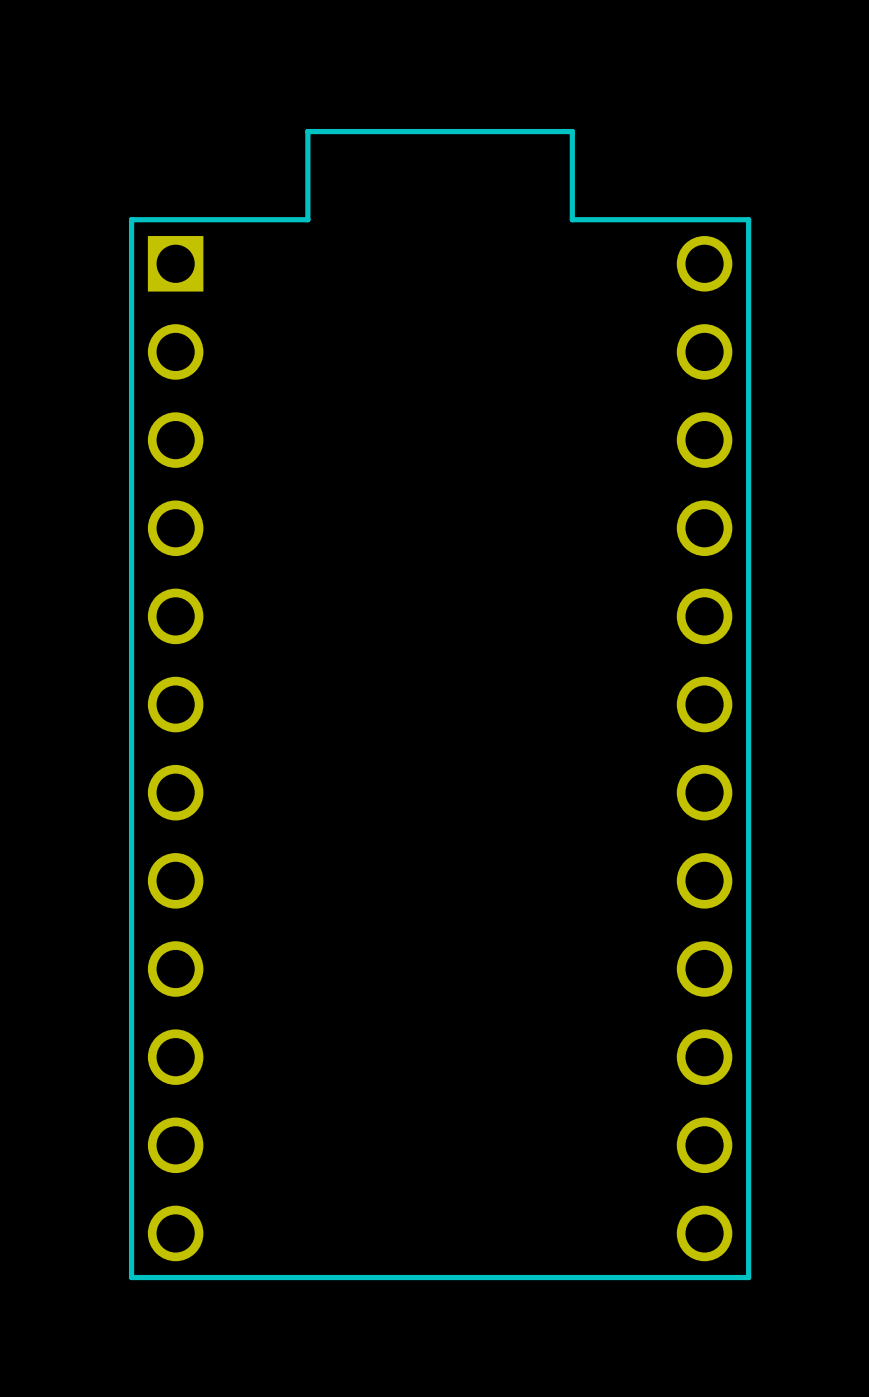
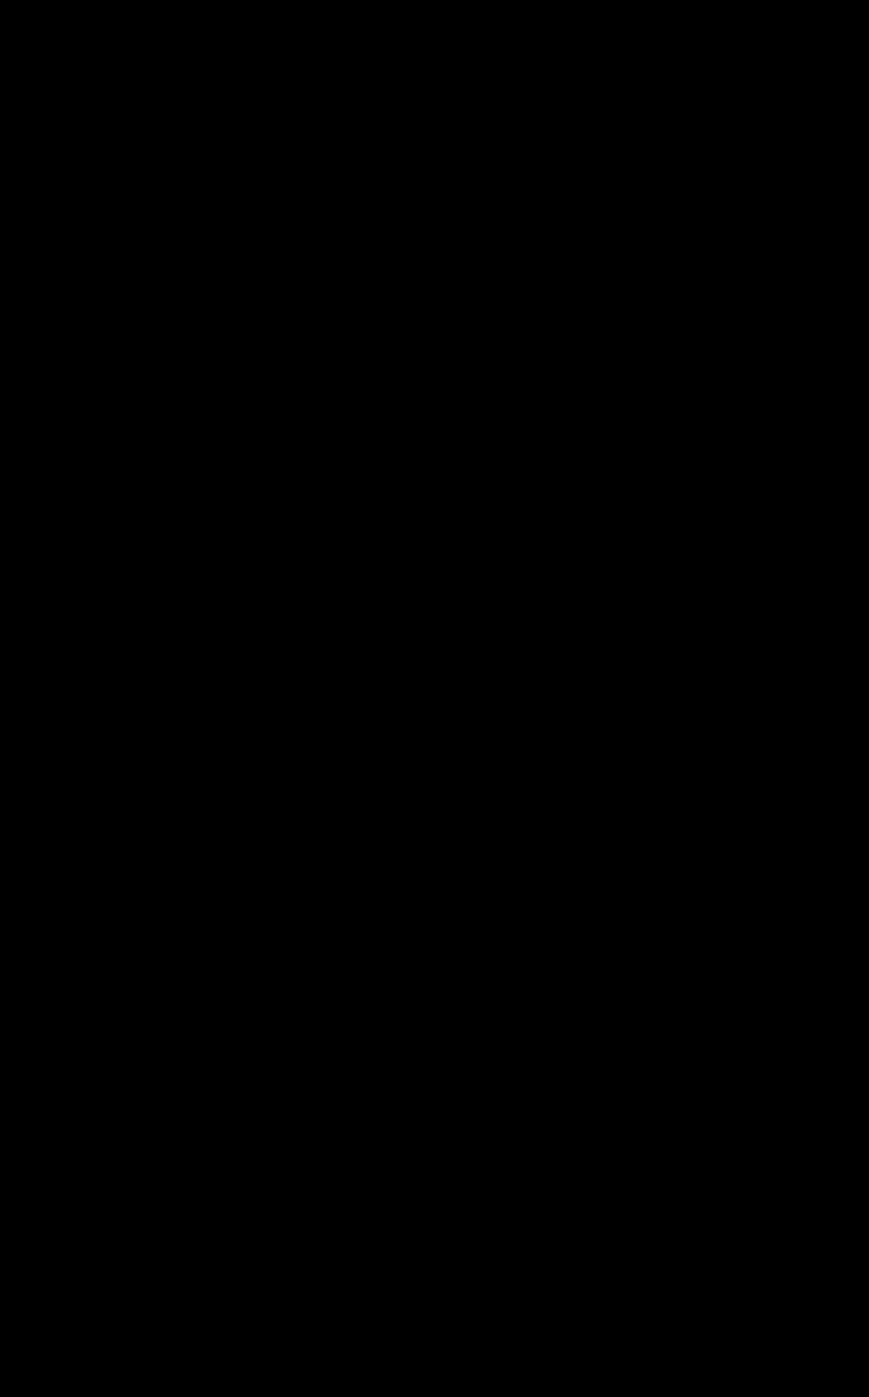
part: (440, 704) -> none

